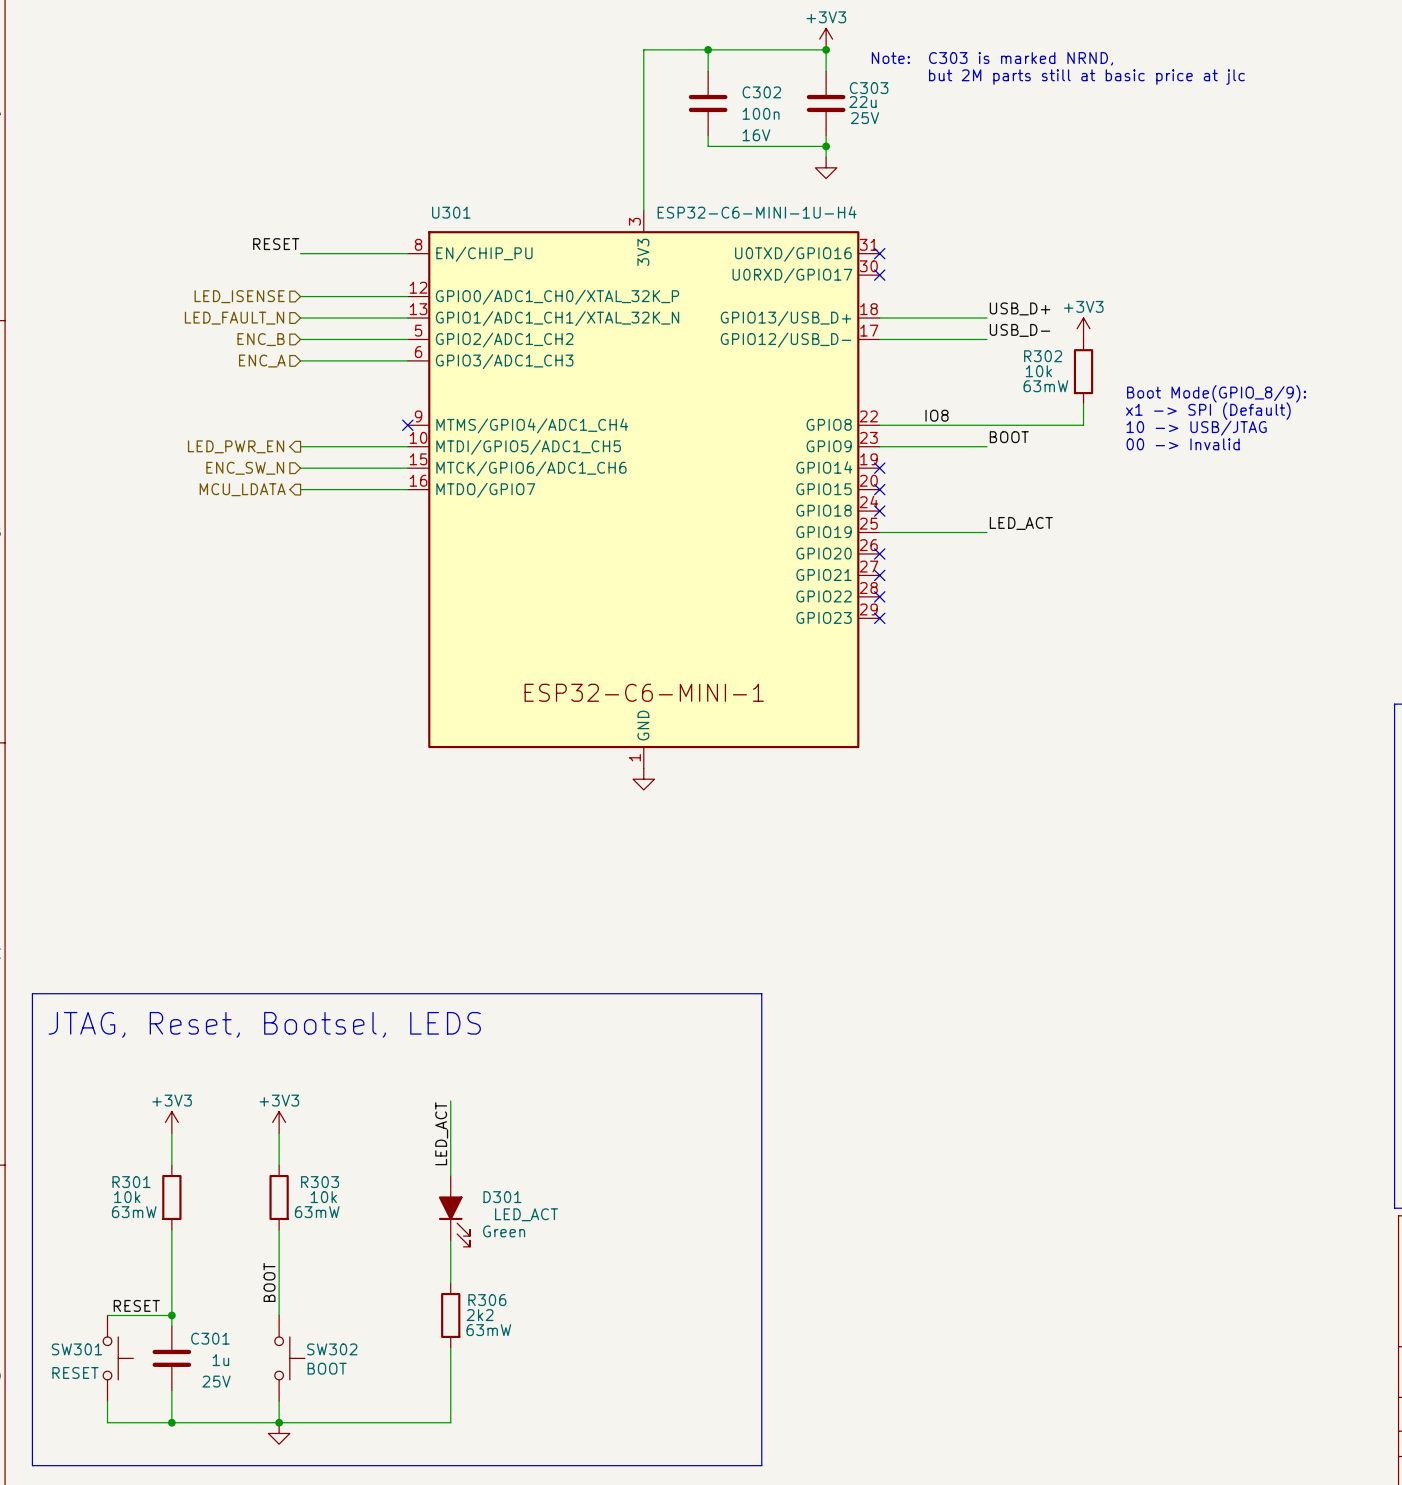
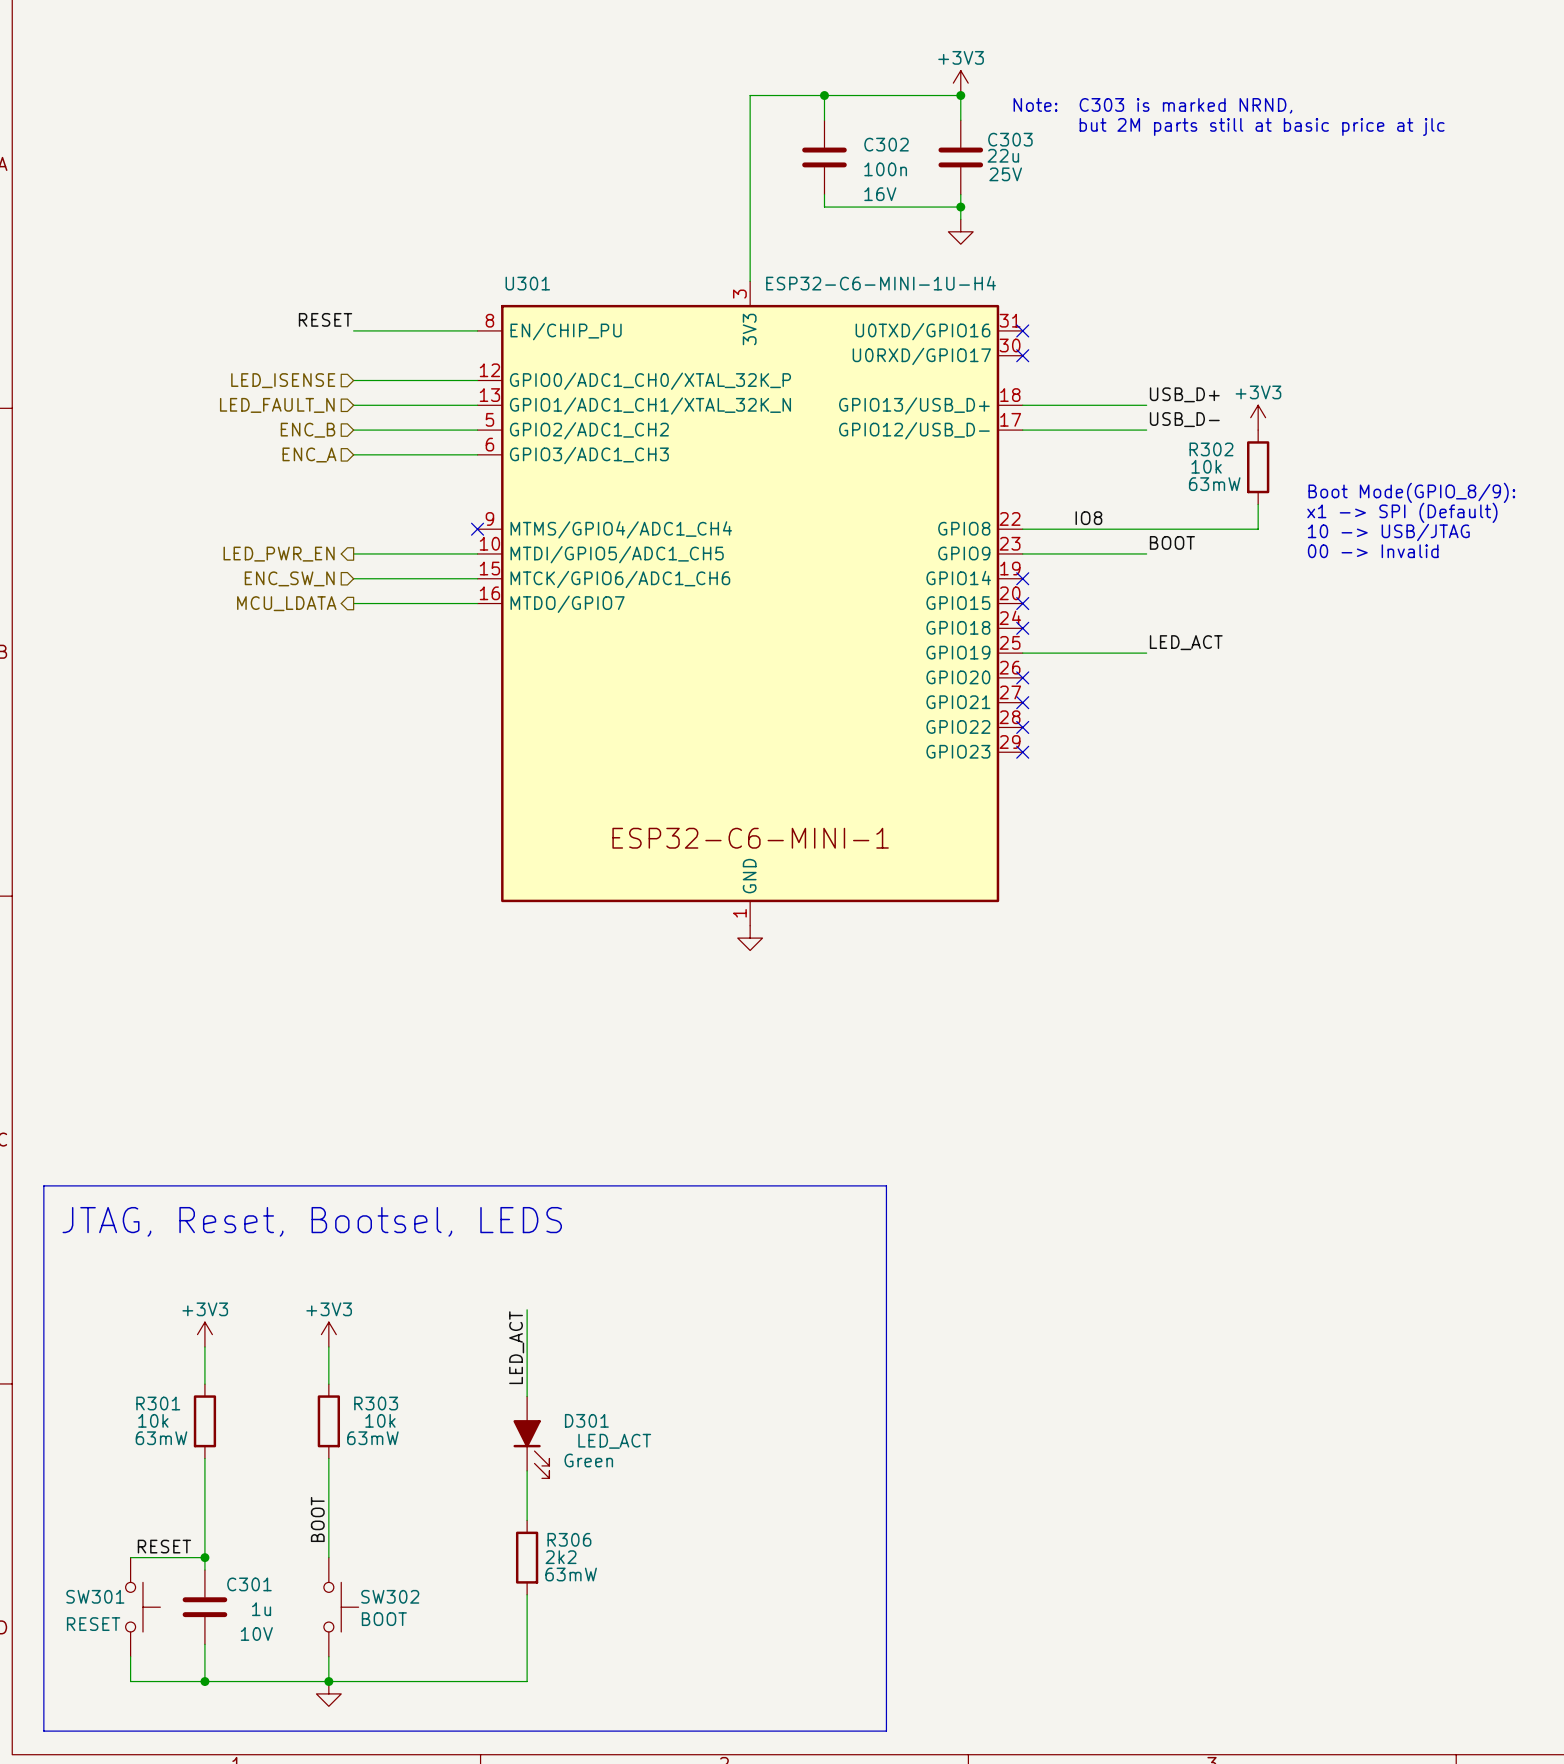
C301 text: 25V (216, 1381) -> 10V (256, 1633)

